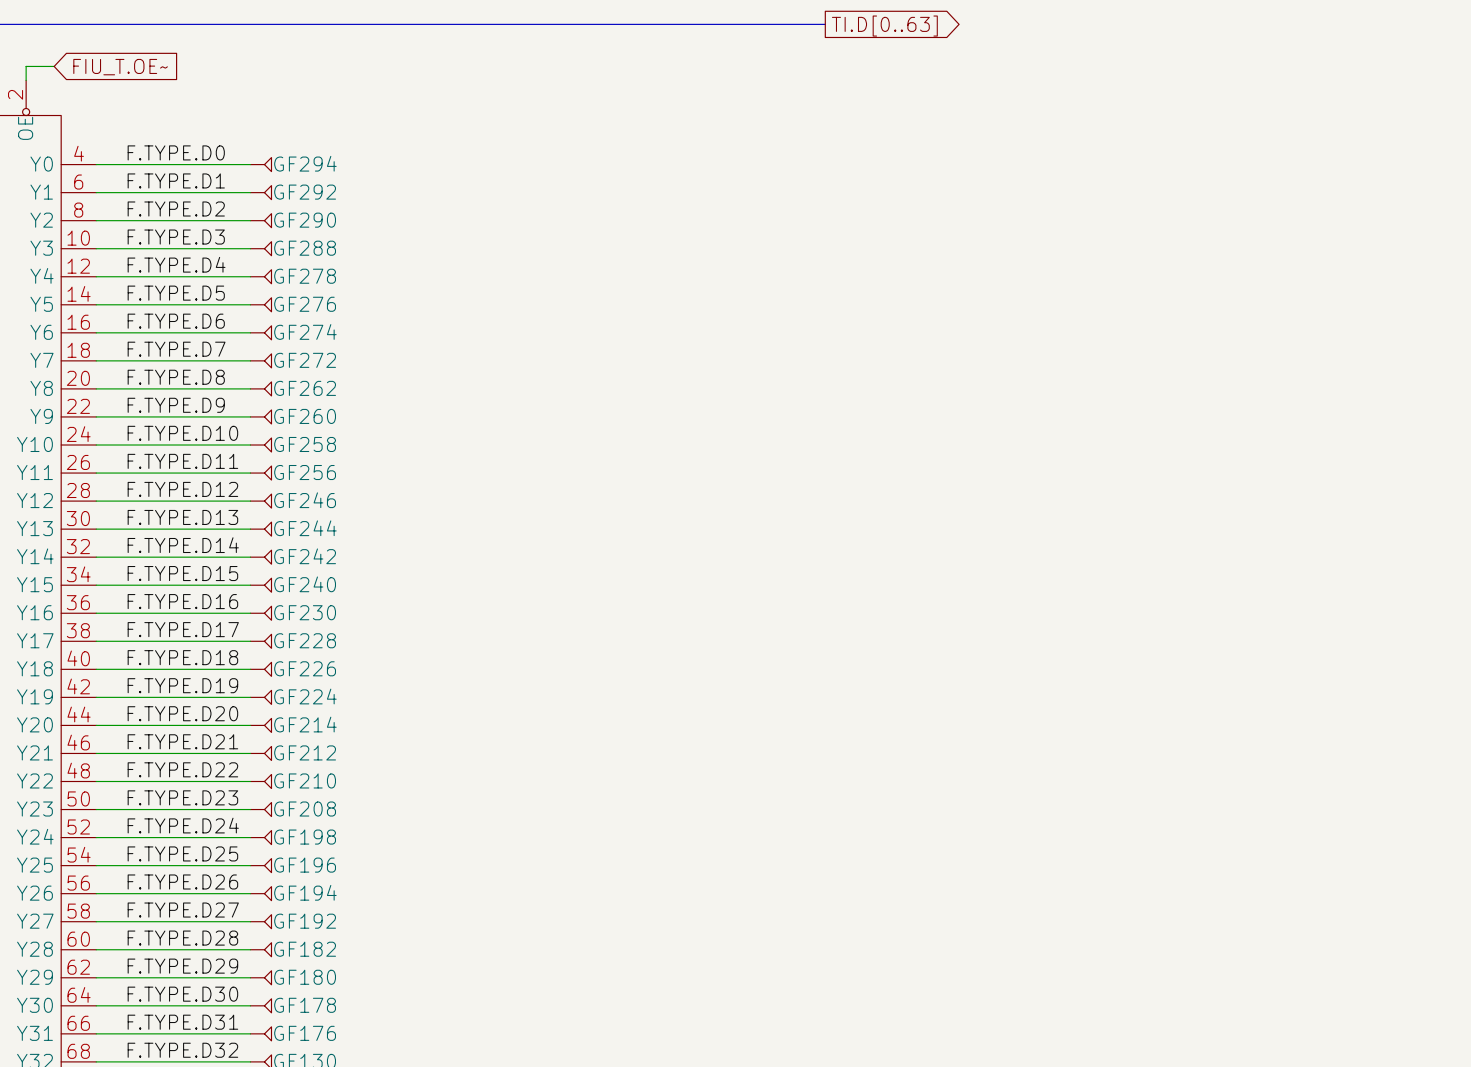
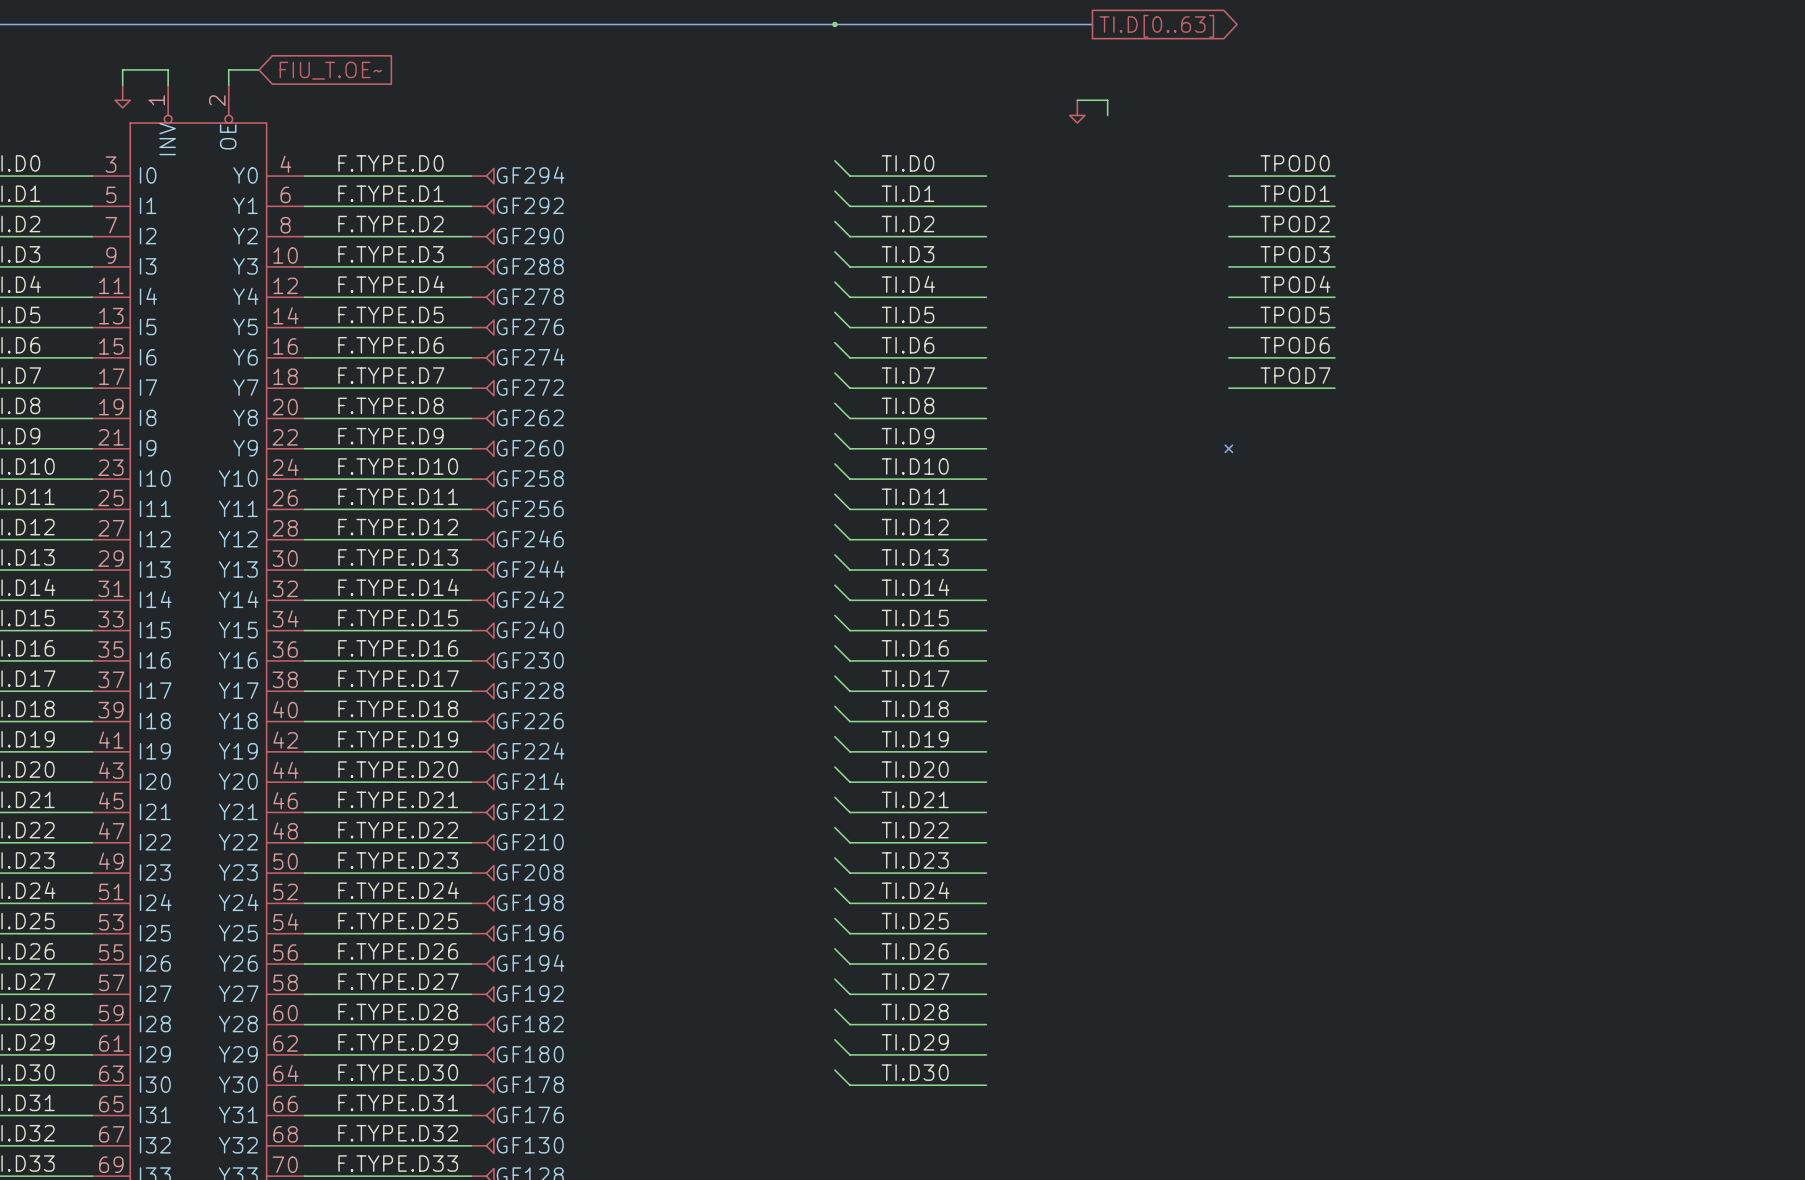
junction: none -> (834, 24)
wire: none -> (1077, 100) (1107, 100) (1107, 115)
power symbol: none -> (1077, 111)
wire: none -> (834, 160) (850, 176) (986, 176)
label: none -> TI.D0 (908, 163)
label: none -> TPOD0 (1295, 163)
wire: none -> (1228, 176) (1334, 176)
wire: none -> (834, 191) (850, 206) (986, 206)
label: none -> TI.D1 (908, 193)
label: none -> TPOD1 (1295, 193)
wire: none -> (1228, 206) (1334, 206)
wire: none -> (834, 221) (850, 236) (986, 236)
label: none -> TI.D2 (908, 224)
label: none -> TPOD2 (1295, 224)
wire: none -> (1228, 236) (1334, 236)
wire: none -> (834, 251) (850, 266) (986, 266)
label: none -> TI.D3 (908, 254)
label: none -> TPOD3 (1295, 254)
wire: none -> (1228, 266) (1334, 266)
wire: none -> (834, 282) (850, 297) (986, 297)
label: none -> TI.D4 (908, 284)
label: none -> TPOD4 (1295, 284)
wire: none -> (1228, 297) (1334, 297)
wire: none -> (834, 312) (850, 327) (986, 327)
label: none -> TI.D5 (908, 314)
label: none -> TPOD5 (1295, 314)
wire: none -> (1228, 327) (1334, 327)
wire: none -> (834, 342) (850, 357) (986, 357)
label: none -> TI.D6 (908, 345)
label: none -> TPOD6 (1295, 345)
wire: none -> (1228, 357) (1334, 357)
wire: none -> (834, 373) (850, 388) (986, 388)
label: none -> TI.D7 (908, 375)
label: none -> TPOD7 (1295, 375)
wire: none -> (1228, 388) (1334, 388)
wire: none -> (834, 403) (850, 418) (986, 418)
label: none -> TI.D8 (908, 405)
wire: none -> (834, 433) (850, 448) (986, 448)
label: none -> TI.D9 (908, 436)
no-connect mark: none -> (1228, 448)
wire: none -> (834, 463) (850, 479) (986, 479)
label: none -> TI.D10 (915, 466)
wire: none -> (834, 494) (850, 509) (986, 509)
label: none -> TI.D11 (915, 496)
wire: none -> (834, 524) (850, 539) (986, 539)
label: none -> TI.D12 (915, 527)
wire: none -> (834, 554) (850, 570) (986, 570)
label: none -> TI.D13 (915, 557)
wire: none -> (834, 585) (850, 600) (986, 600)
label: none -> TI.D14 (915, 587)
wire: none -> (834, 615) (850, 630) (986, 630)
label: none -> TI.D15 (915, 618)
wire: none -> (834, 645) (850, 660) (986, 660)
label: none -> TI.D16 (915, 648)
wire: none -> (834, 676) (850, 691) (986, 691)
label: none -> TI.D17 (915, 678)
wire: none -> (834, 706) (850, 721) (986, 721)
label: none -> TI.D18 (915, 708)
wire: none -> (834, 736) (850, 751) (986, 751)
label: none -> TI.D19 (915, 739)
wire: none -> (834, 767) (850, 782) (986, 782)
label: none -> TI.D20 (915, 769)
wire: none -> (834, 797) (850, 812) (986, 812)
label: none -> TI.D21 (915, 799)
wire: none -> (834, 827) (850, 842) (986, 842)
label: none -> TI.D22 (915, 830)
wire: none -> (834, 857) (850, 873) (986, 873)
label: none -> TI.D23 (915, 860)
wire: none -> (834, 888) (850, 903) (986, 903)
label: none -> TI.D24 (915, 890)
wire: none -> (834, 918) (850, 933) (986, 933)
label: none -> TI.D25 (915, 921)
wire: none -> (834, 948) (850, 964) (986, 964)
label: none -> TI.D26 (915, 951)
wire: none -> (834, 979) (850, 994) (986, 994)
label: none -> TI.D27 (915, 981)
wire: none -> (834, 1009) (850, 1024) (986, 1024)
label: none -> TI.D28 (915, 1012)
wire: none -> (834, 1039) (850, 1054) (986, 1054)
label: none -> TI.D29 (915, 1042)
wire: none -> (834, 1070) (850, 1085) (986, 1085)
label: none -> TI.D30 (915, 1072)

